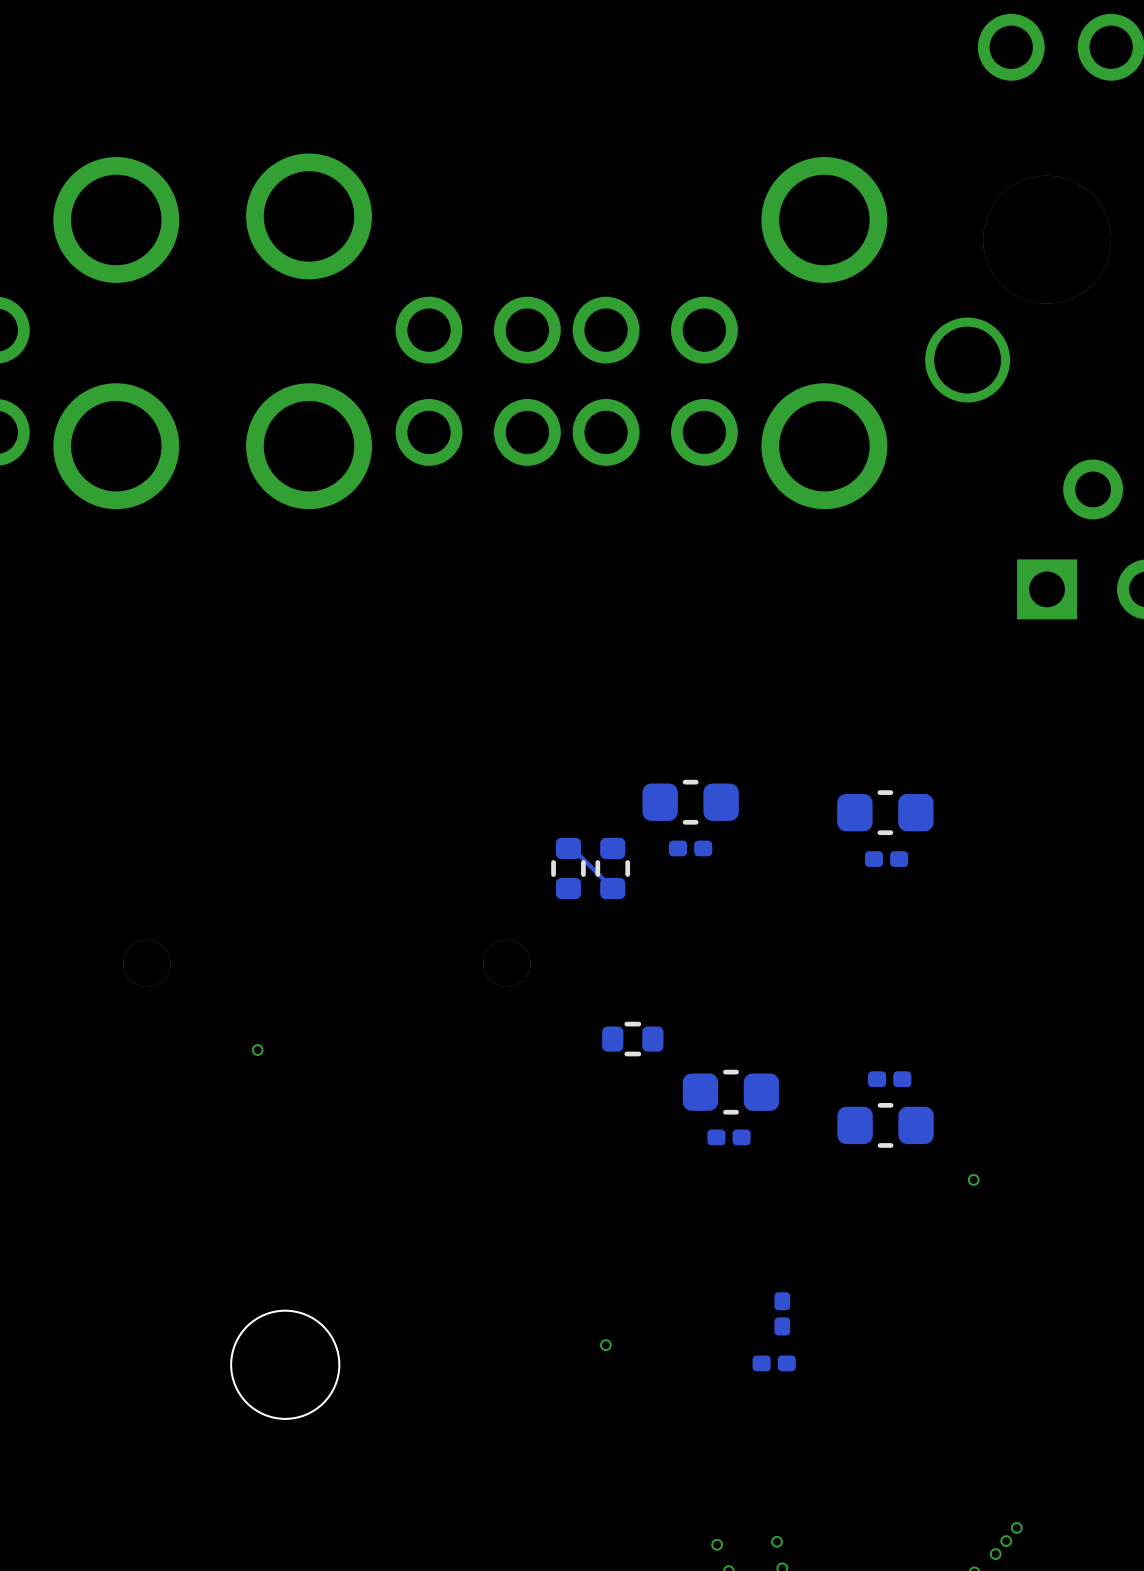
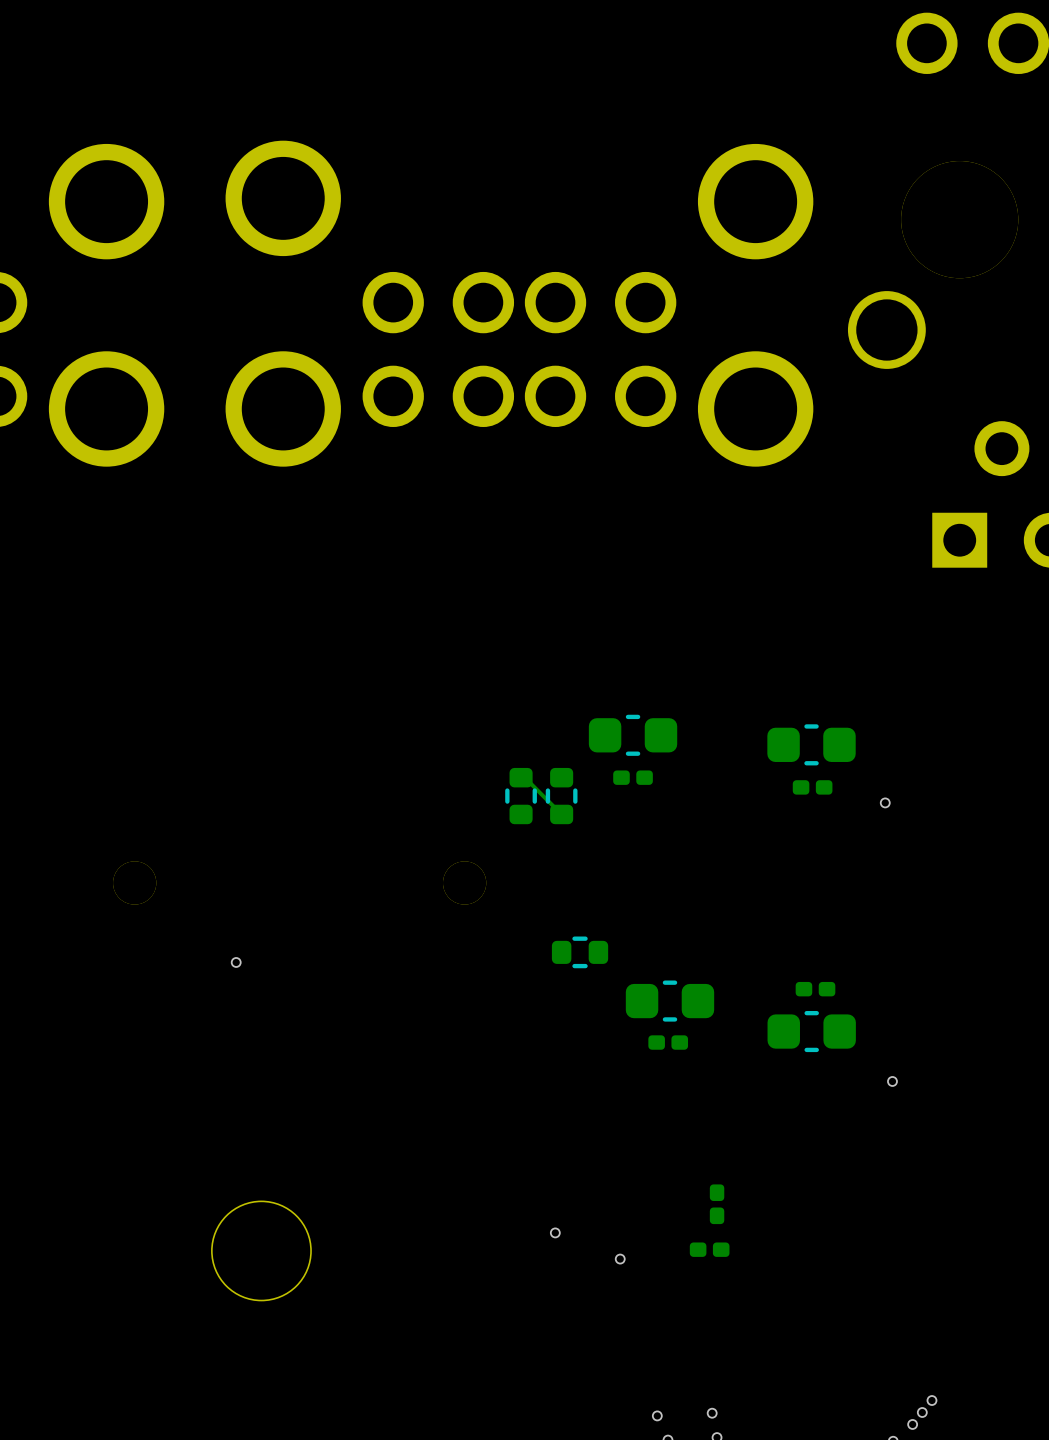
via: none -> (885, 802)
via: none -> (620, 1259)

